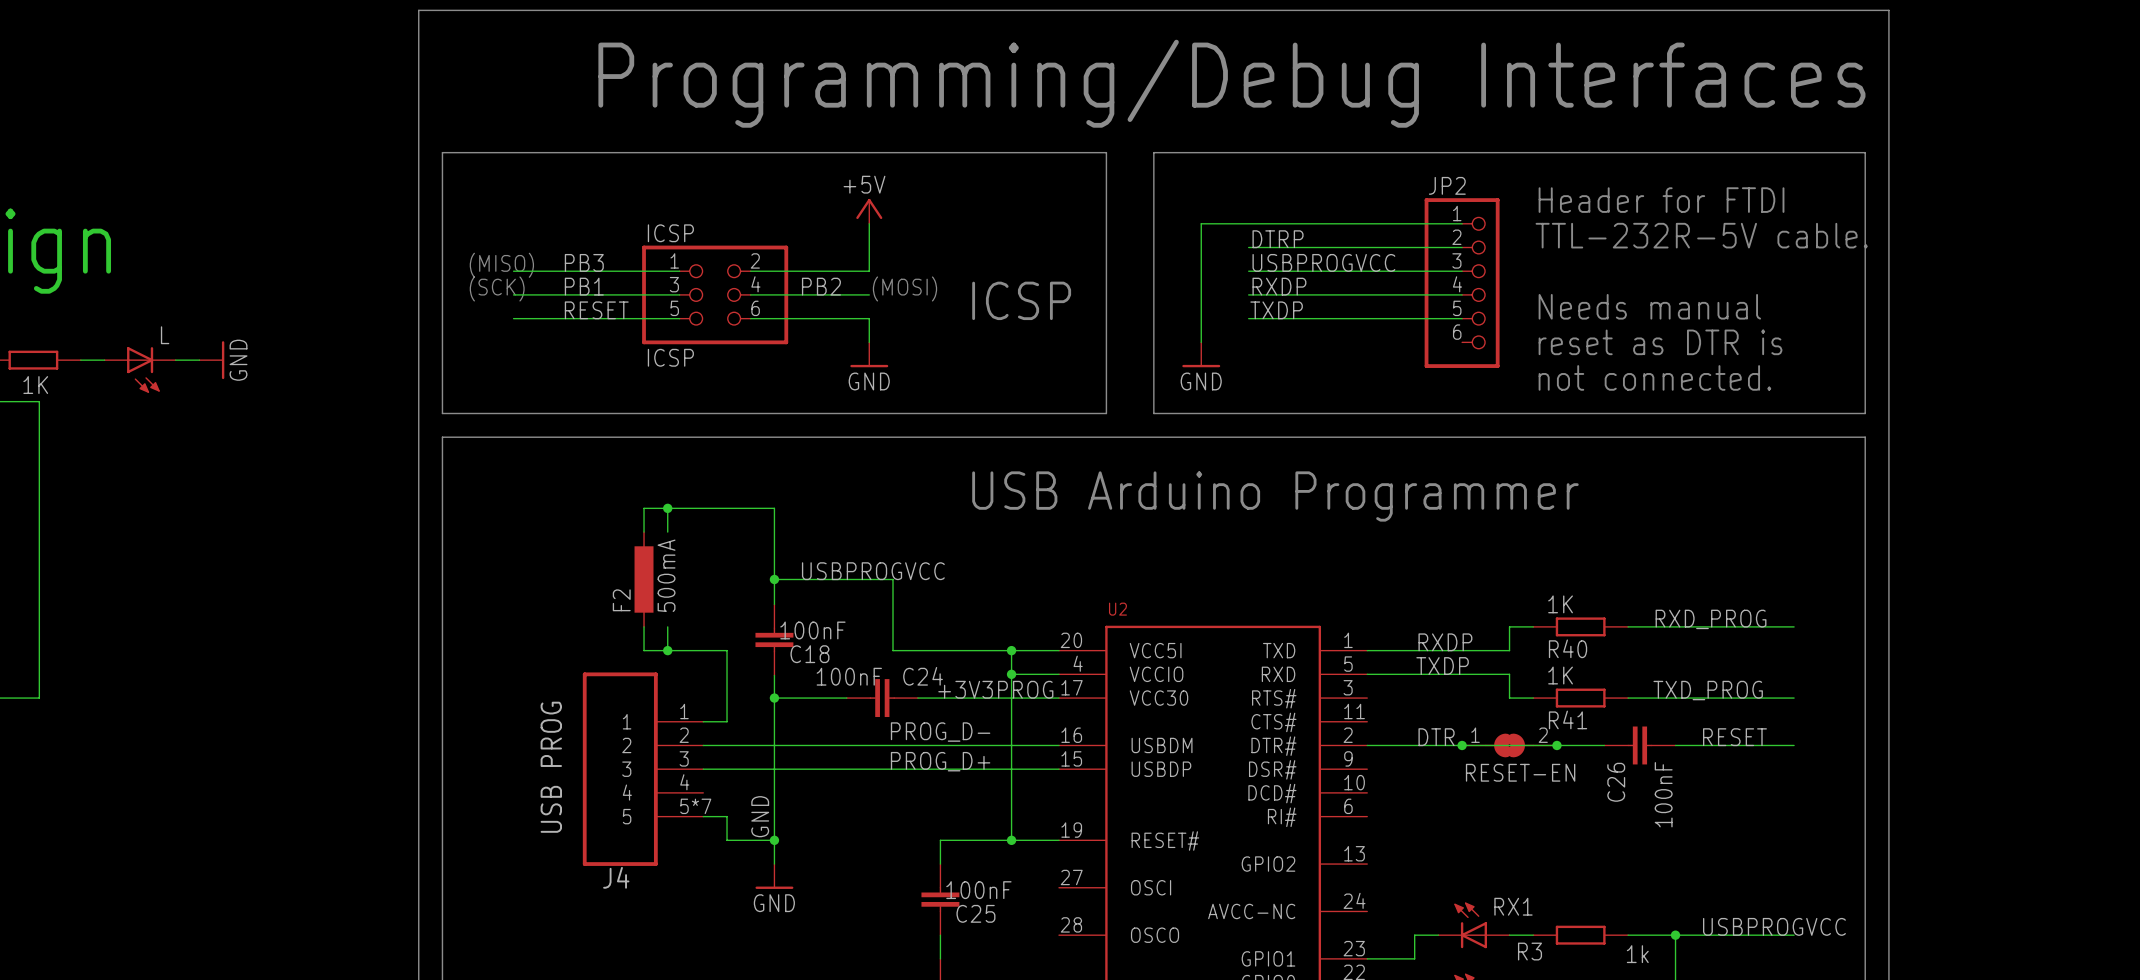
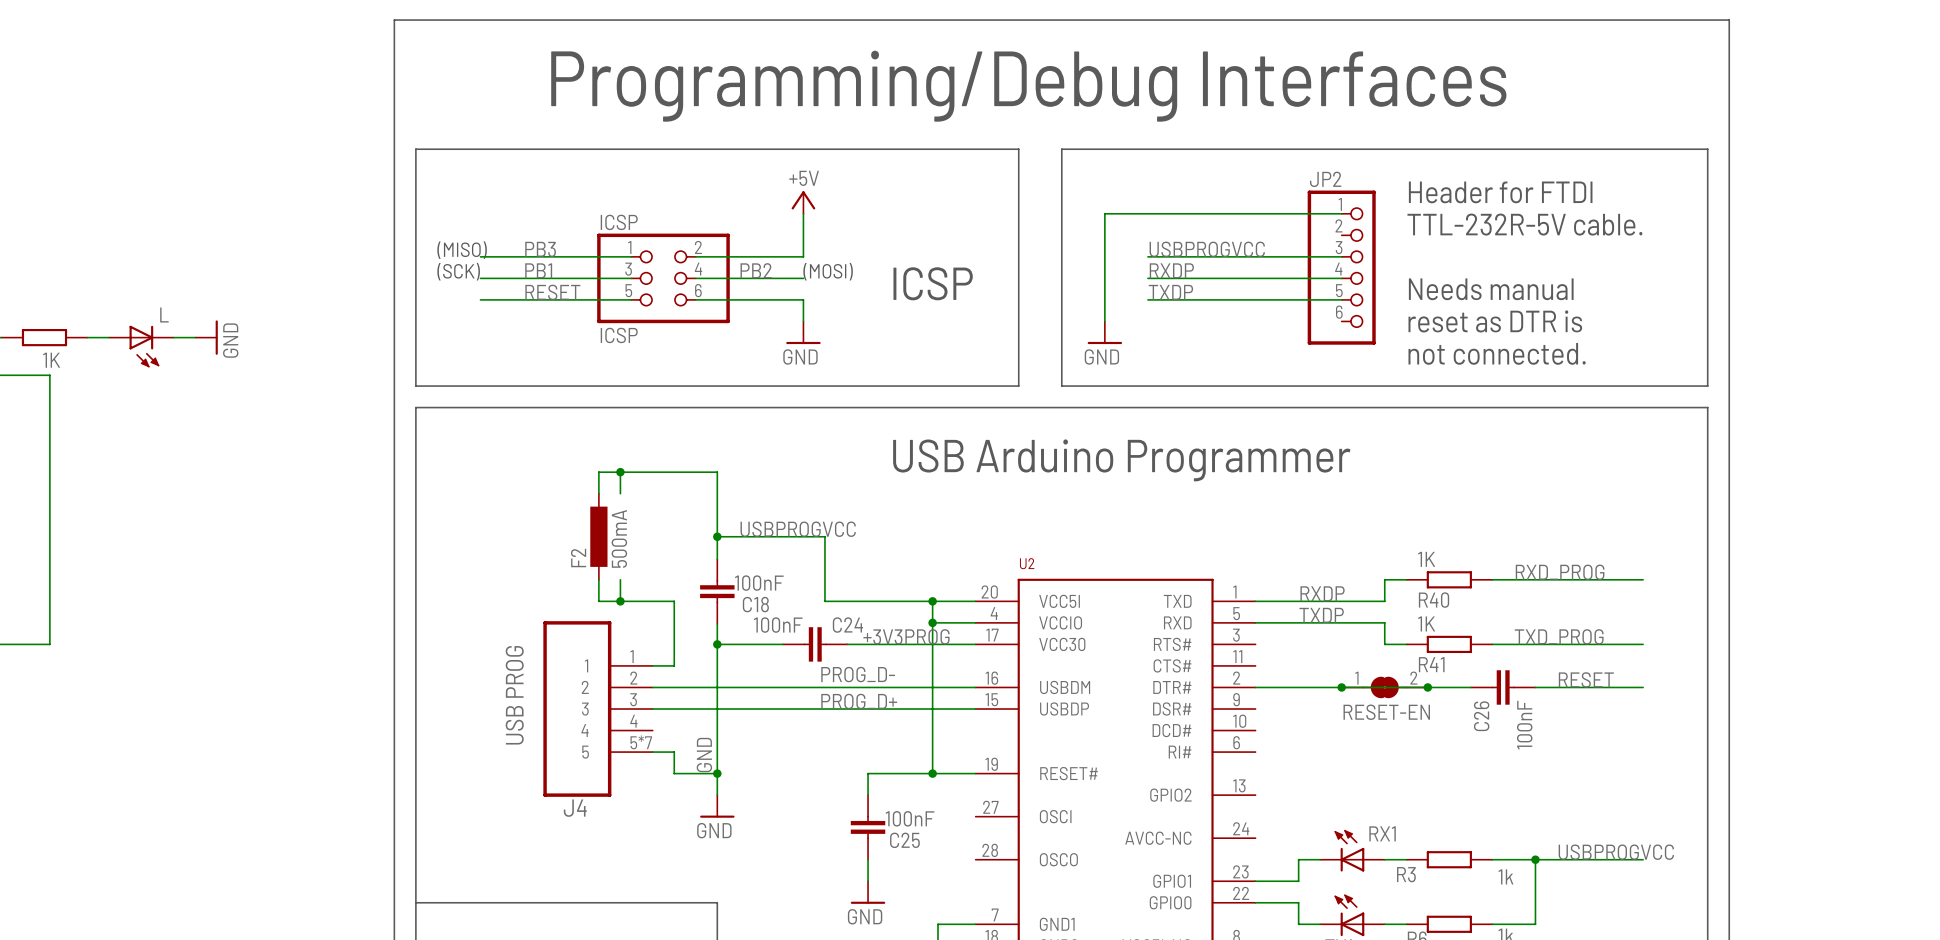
label: DTRP (1278, 239) -> none
wire: (1248, 247) (1462, 247) -> none
label: DTR (1436, 737) -> none

